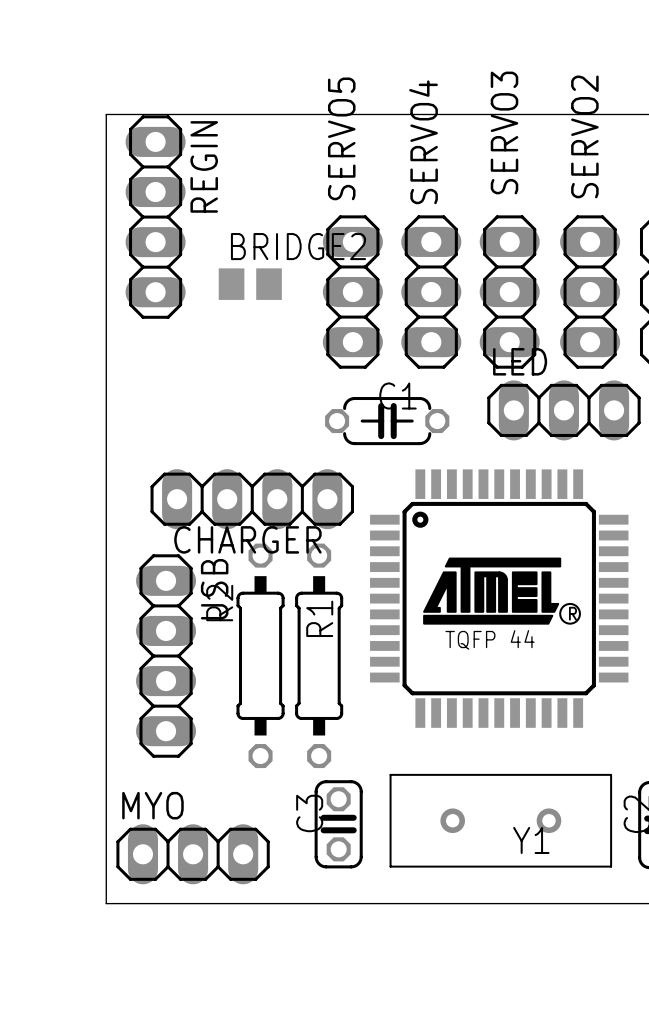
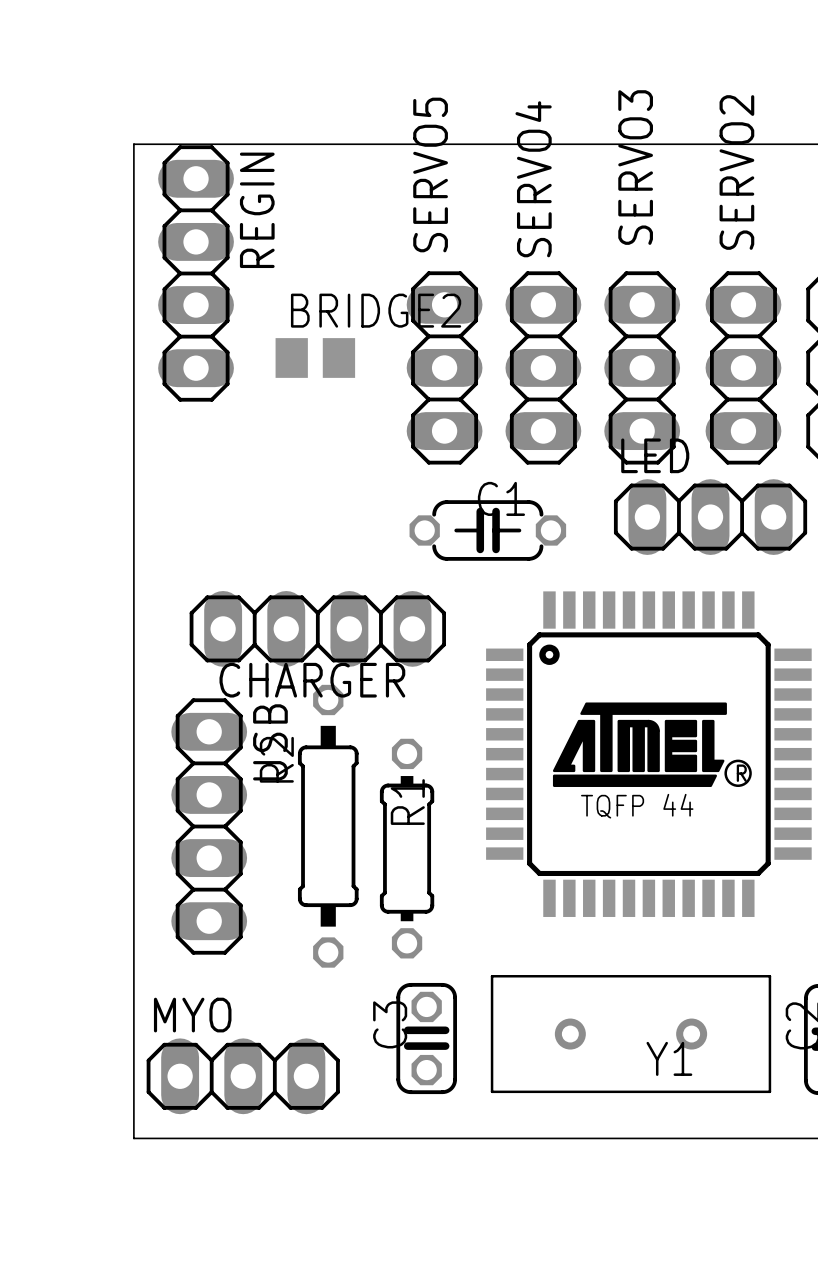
R1 footprint: [295, 543, 344, 769] -> [379, 738, 435, 959]
part position: (499, 598) -> (648, 754)

